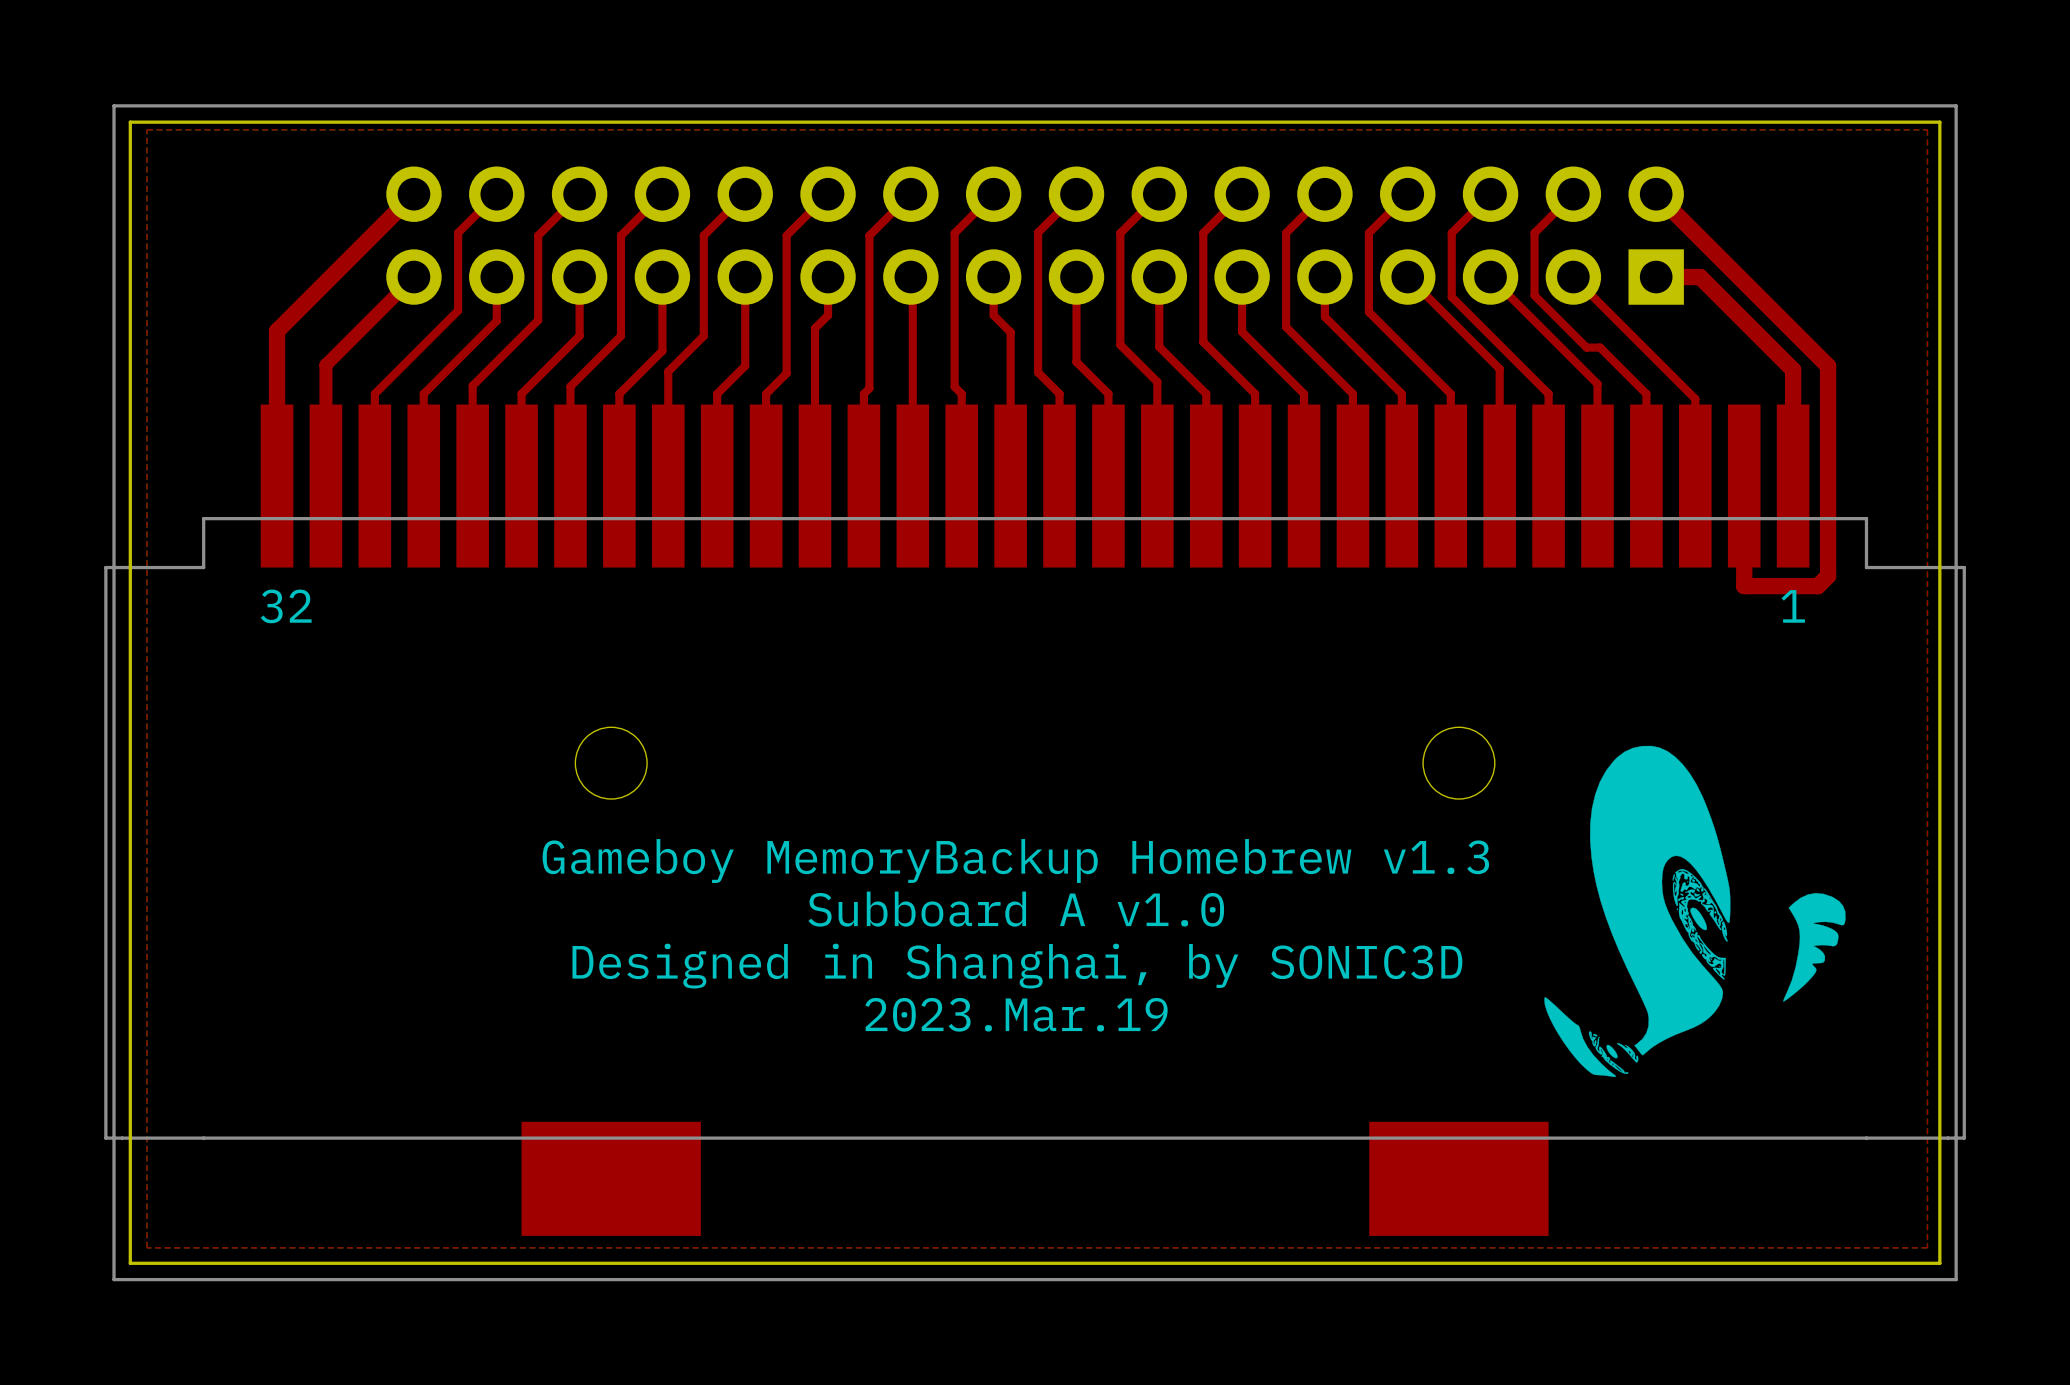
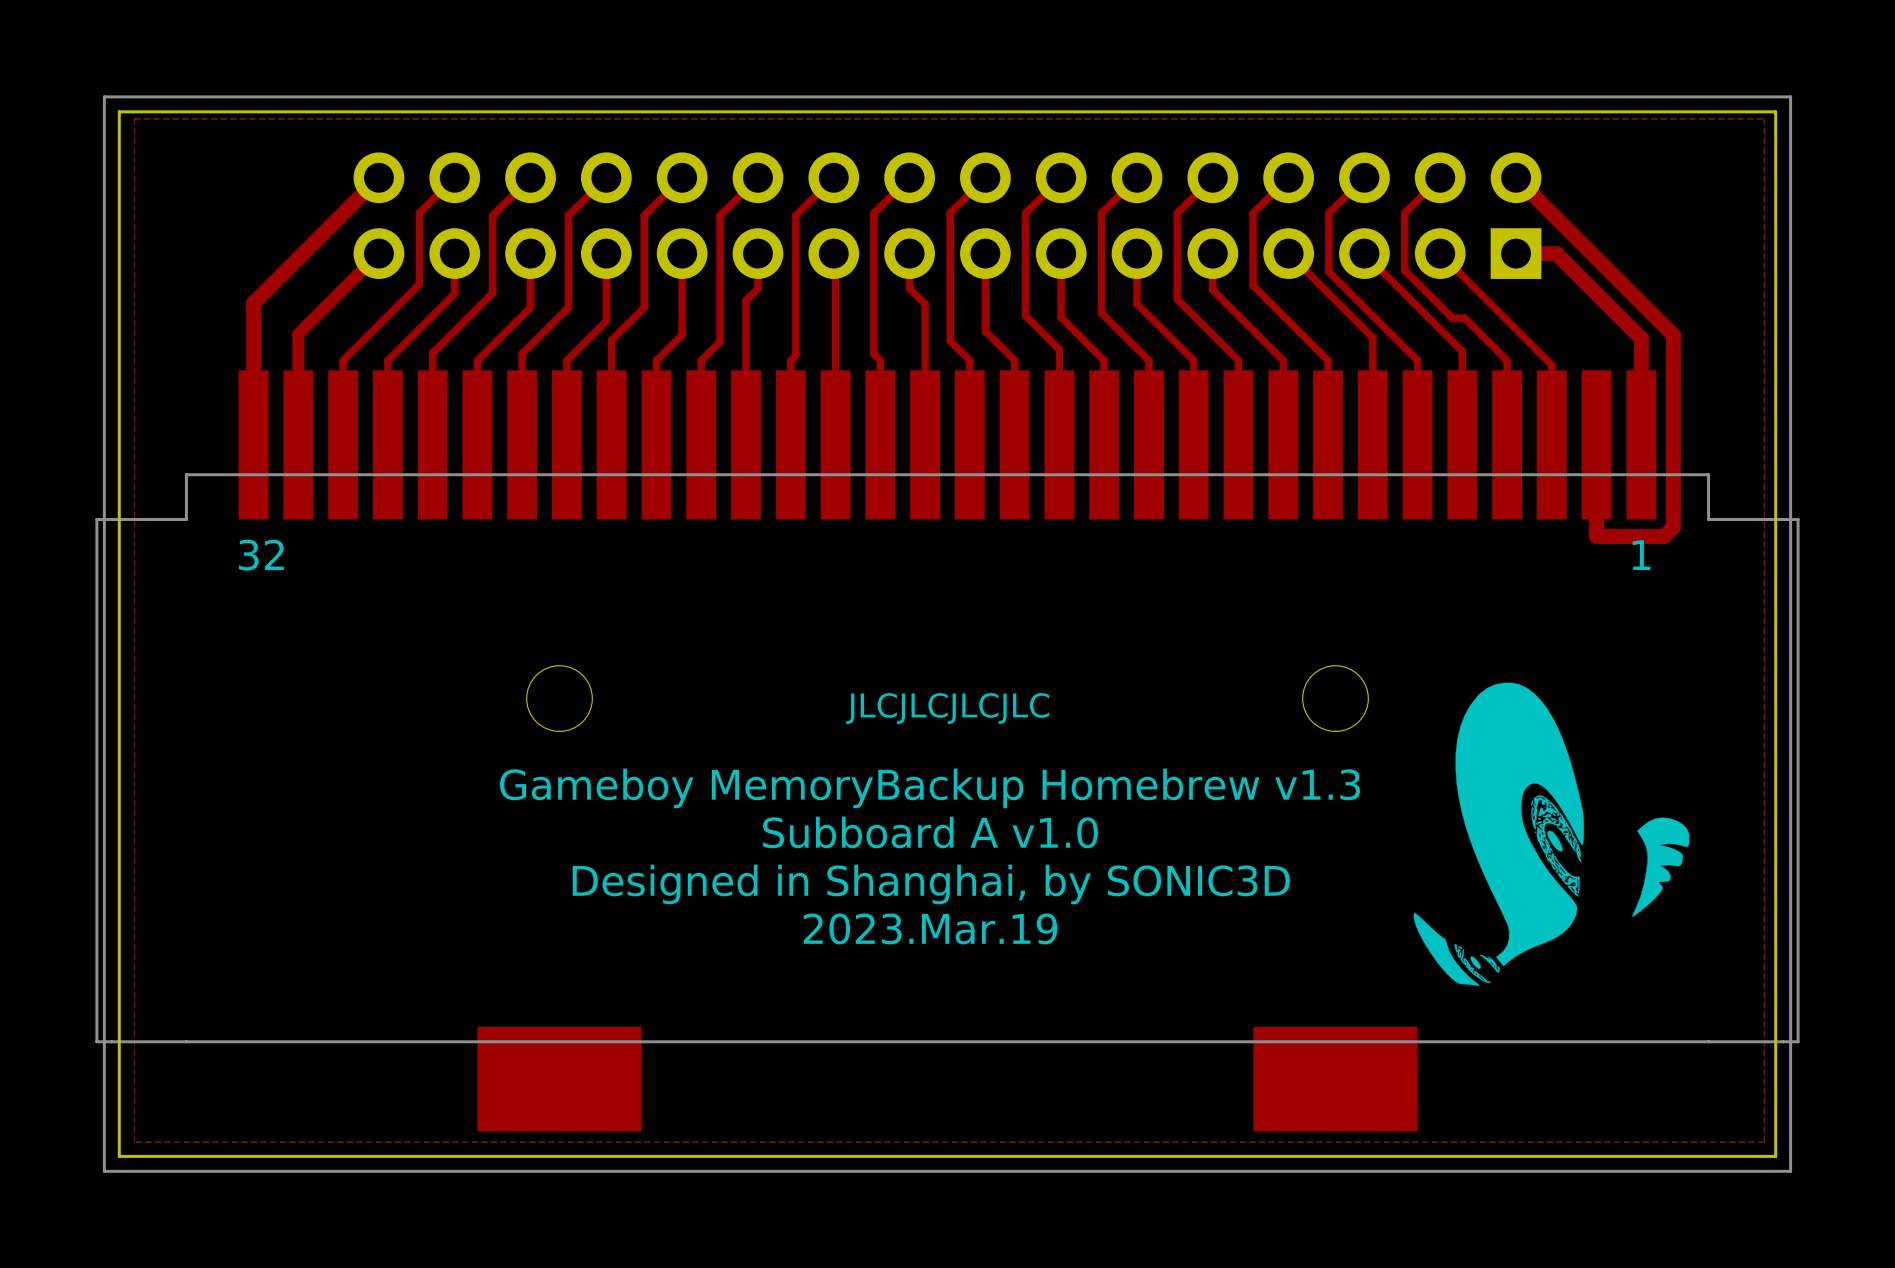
text: none -> JLCJLCJLCJLC (947, 708)

